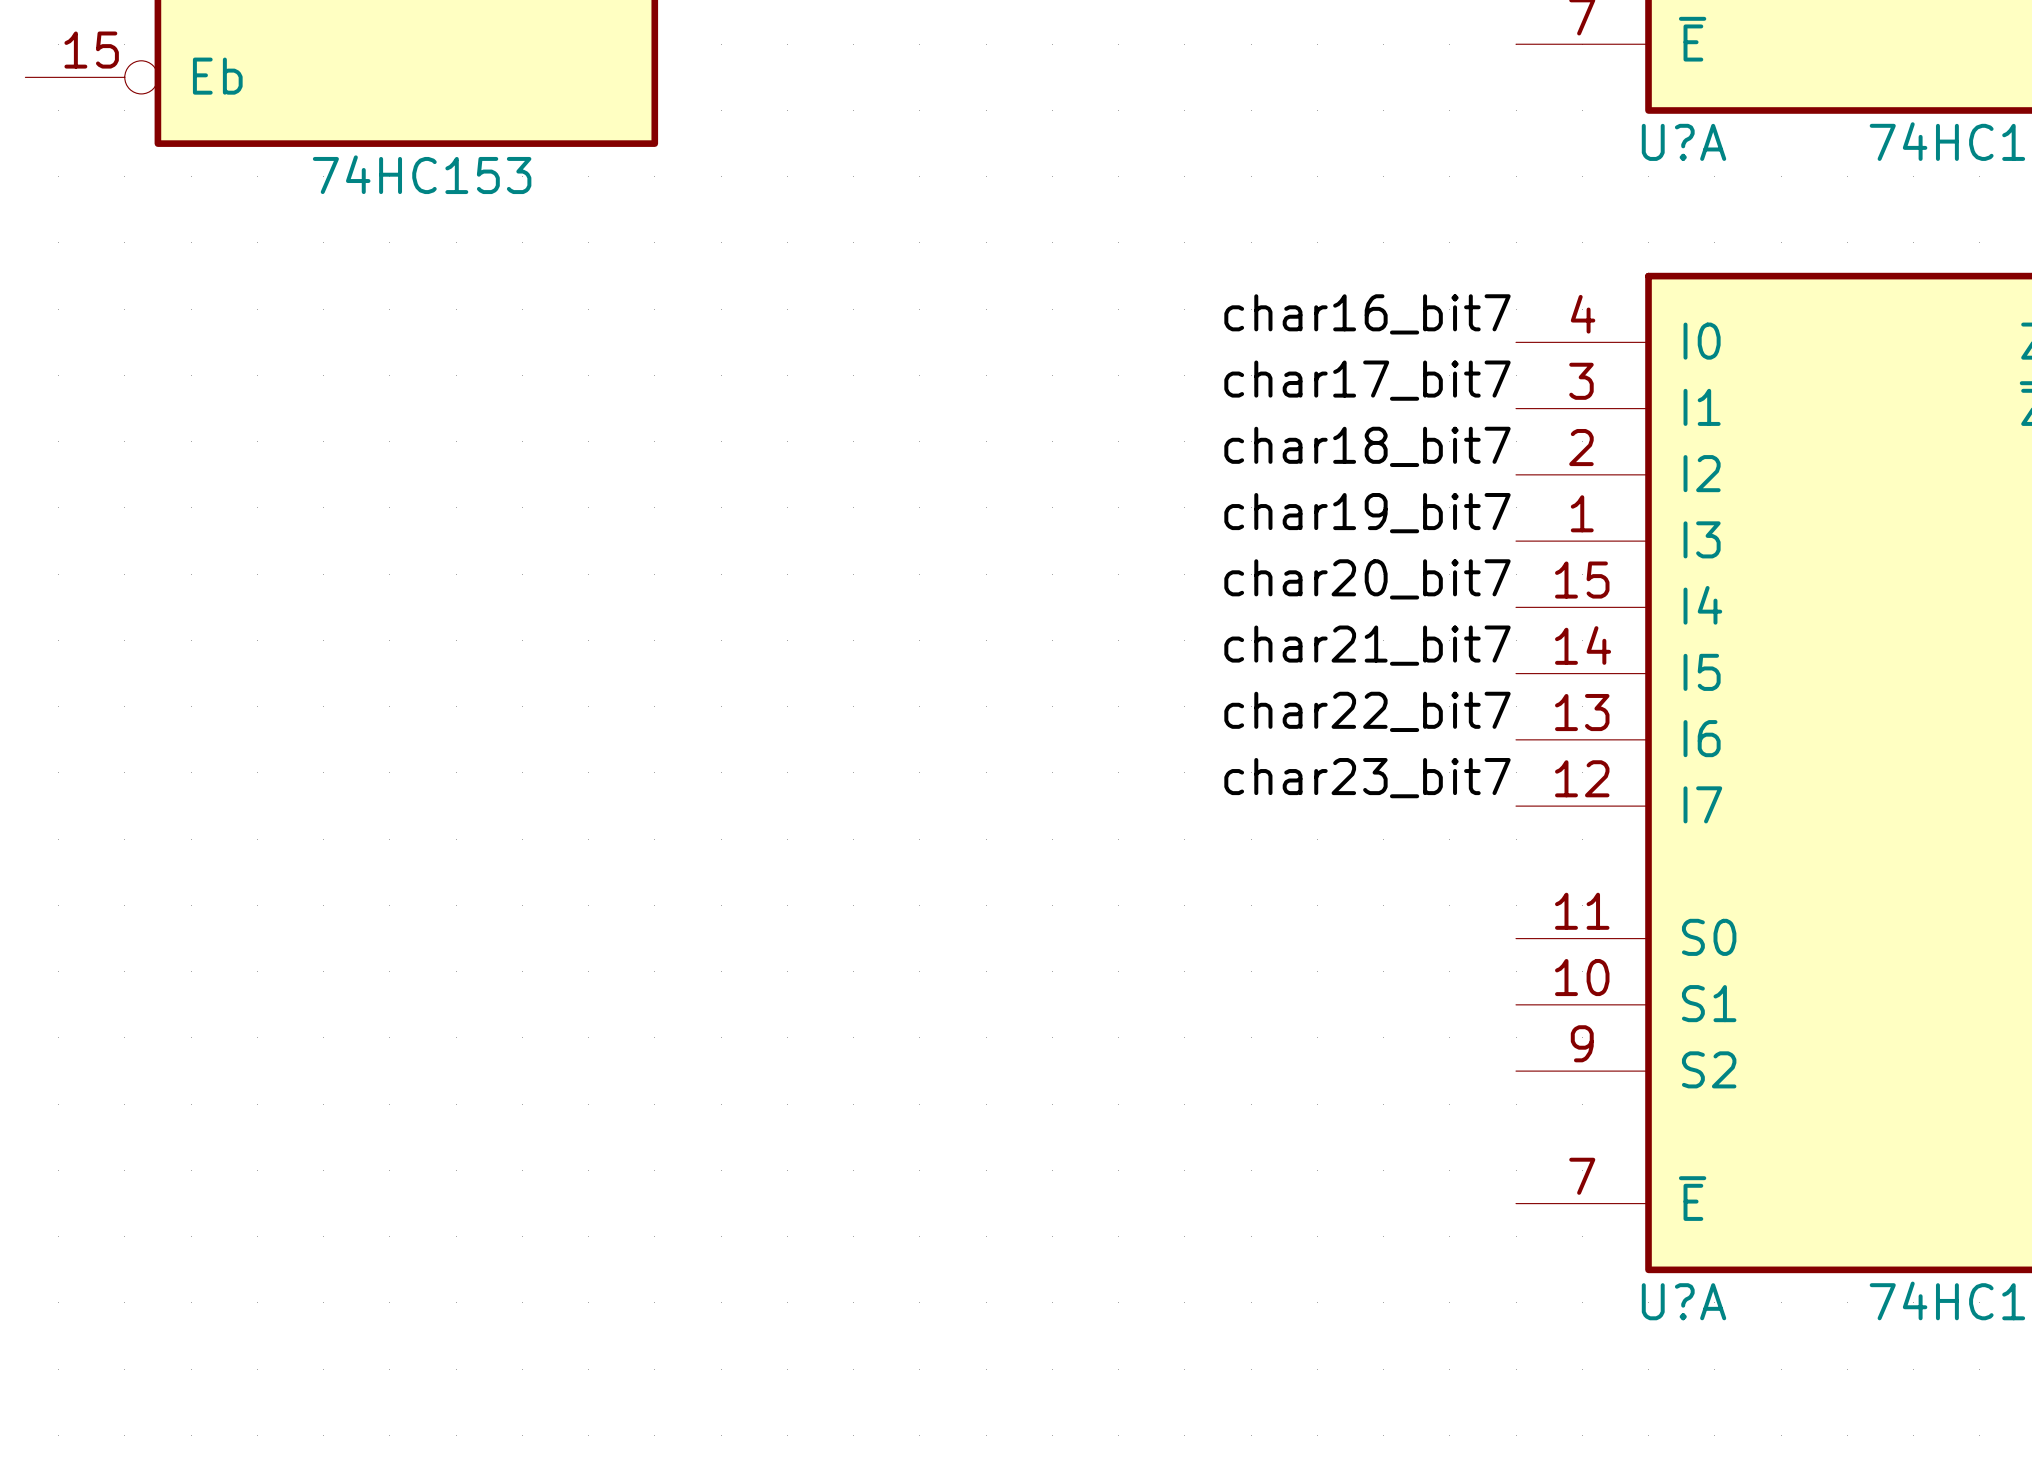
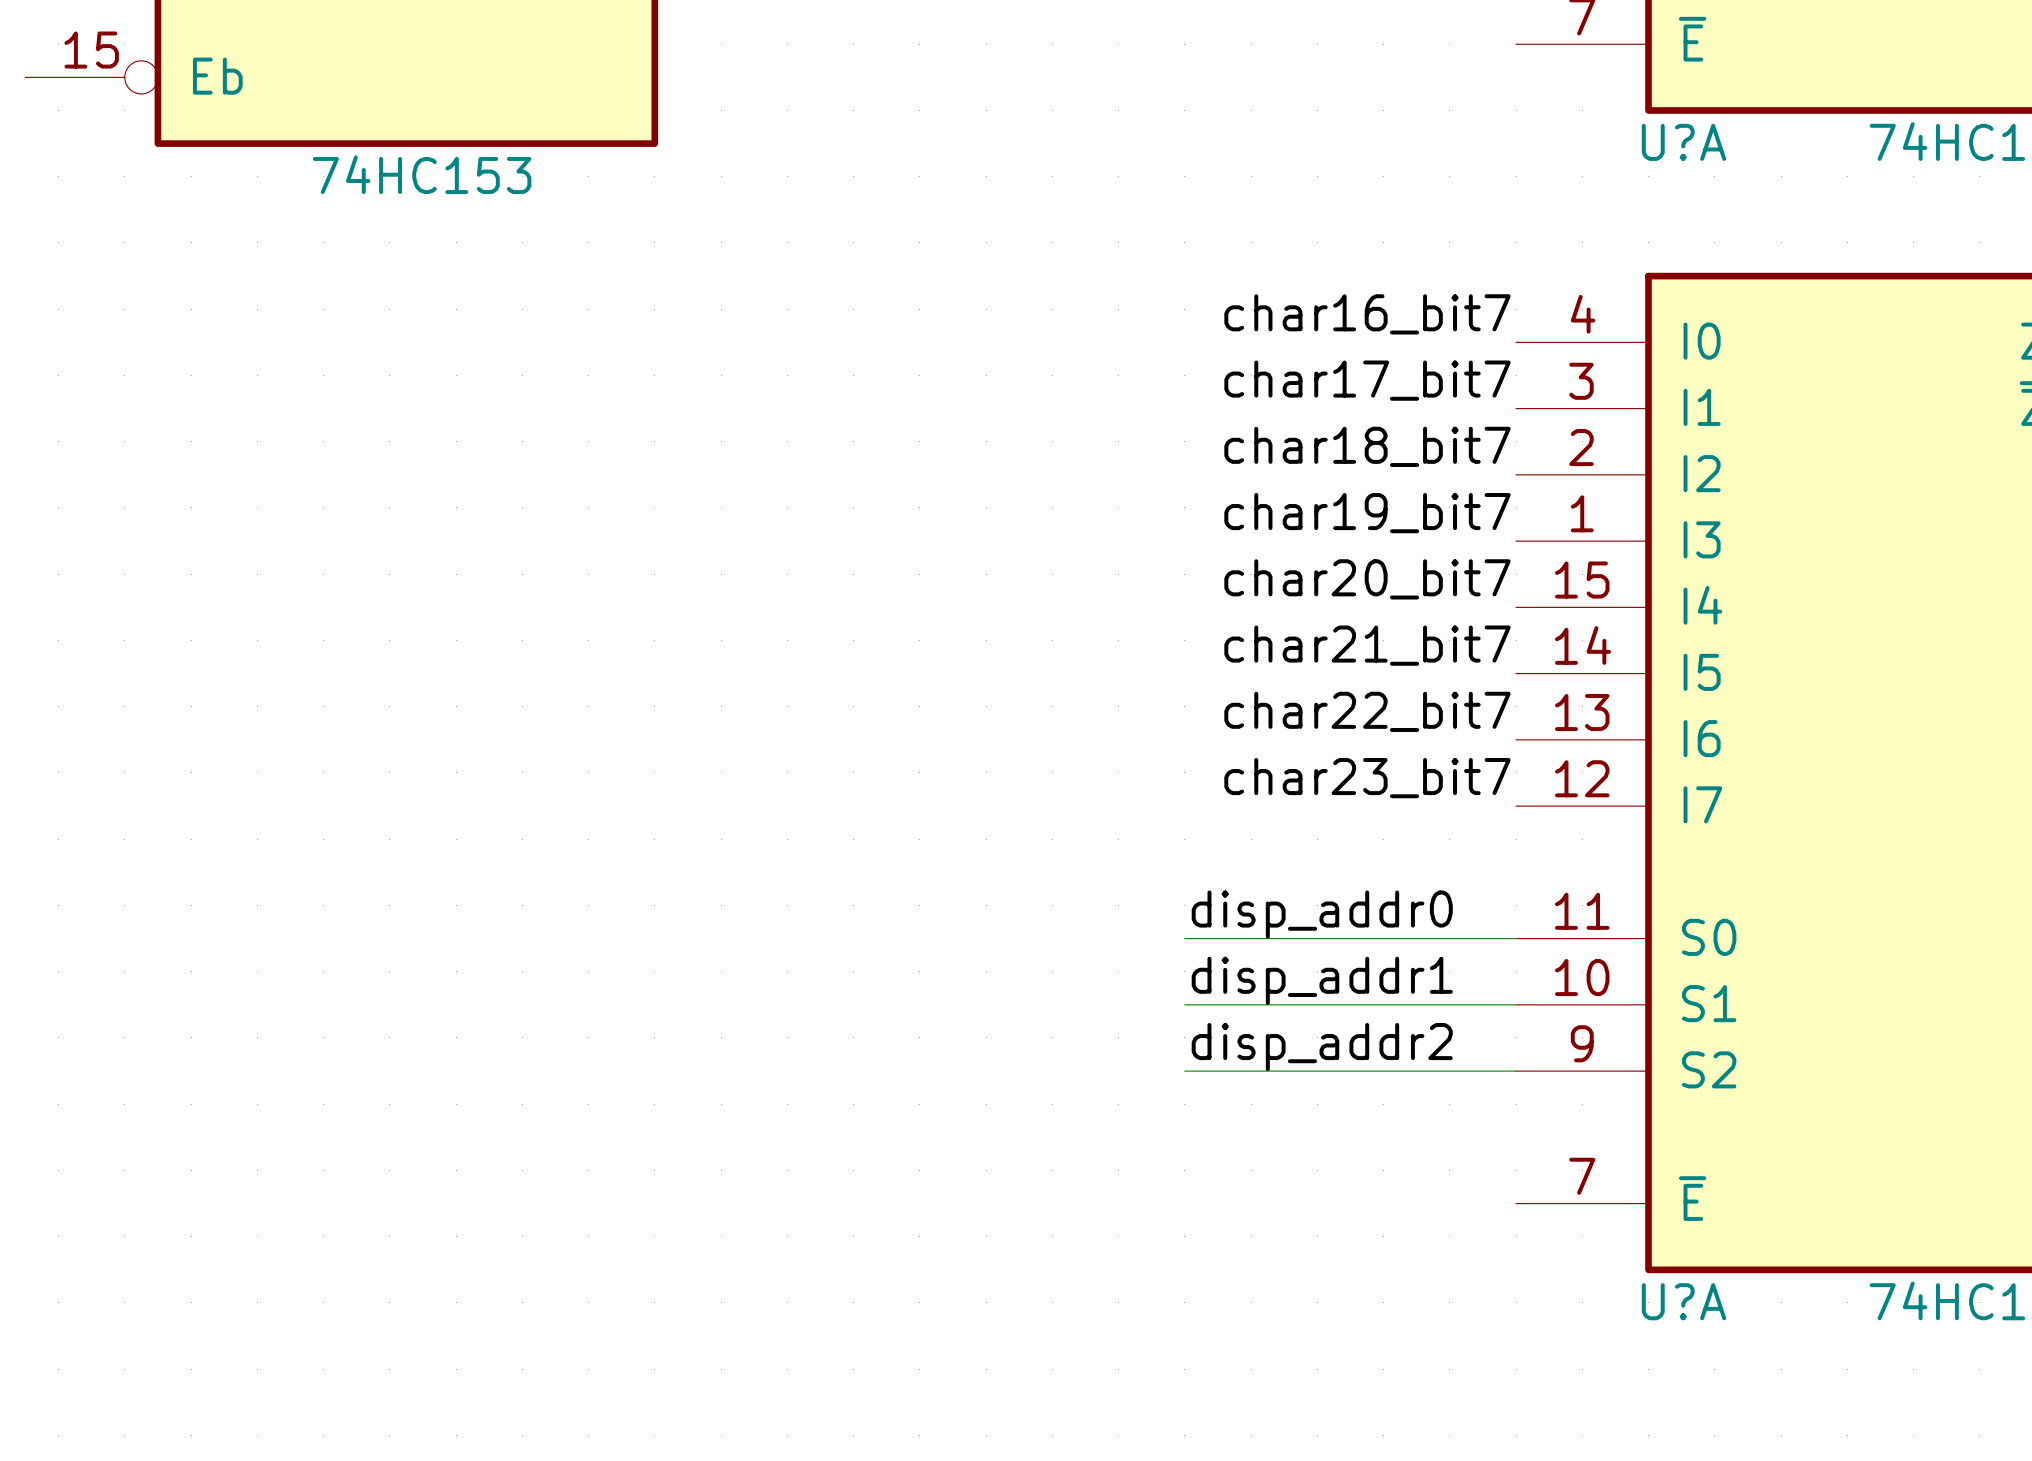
label: none -> disp_addr0 (1322, 914)
wire: none -> (1184, 938) (1516, 938)
label: none -> disp_addr1 (1322, 980)
wire: none -> (1184, 1004) (1516, 1004)
label: none -> disp_addr2 (1322, 1047)
wire: none -> (1184, 1071) (1516, 1071)

